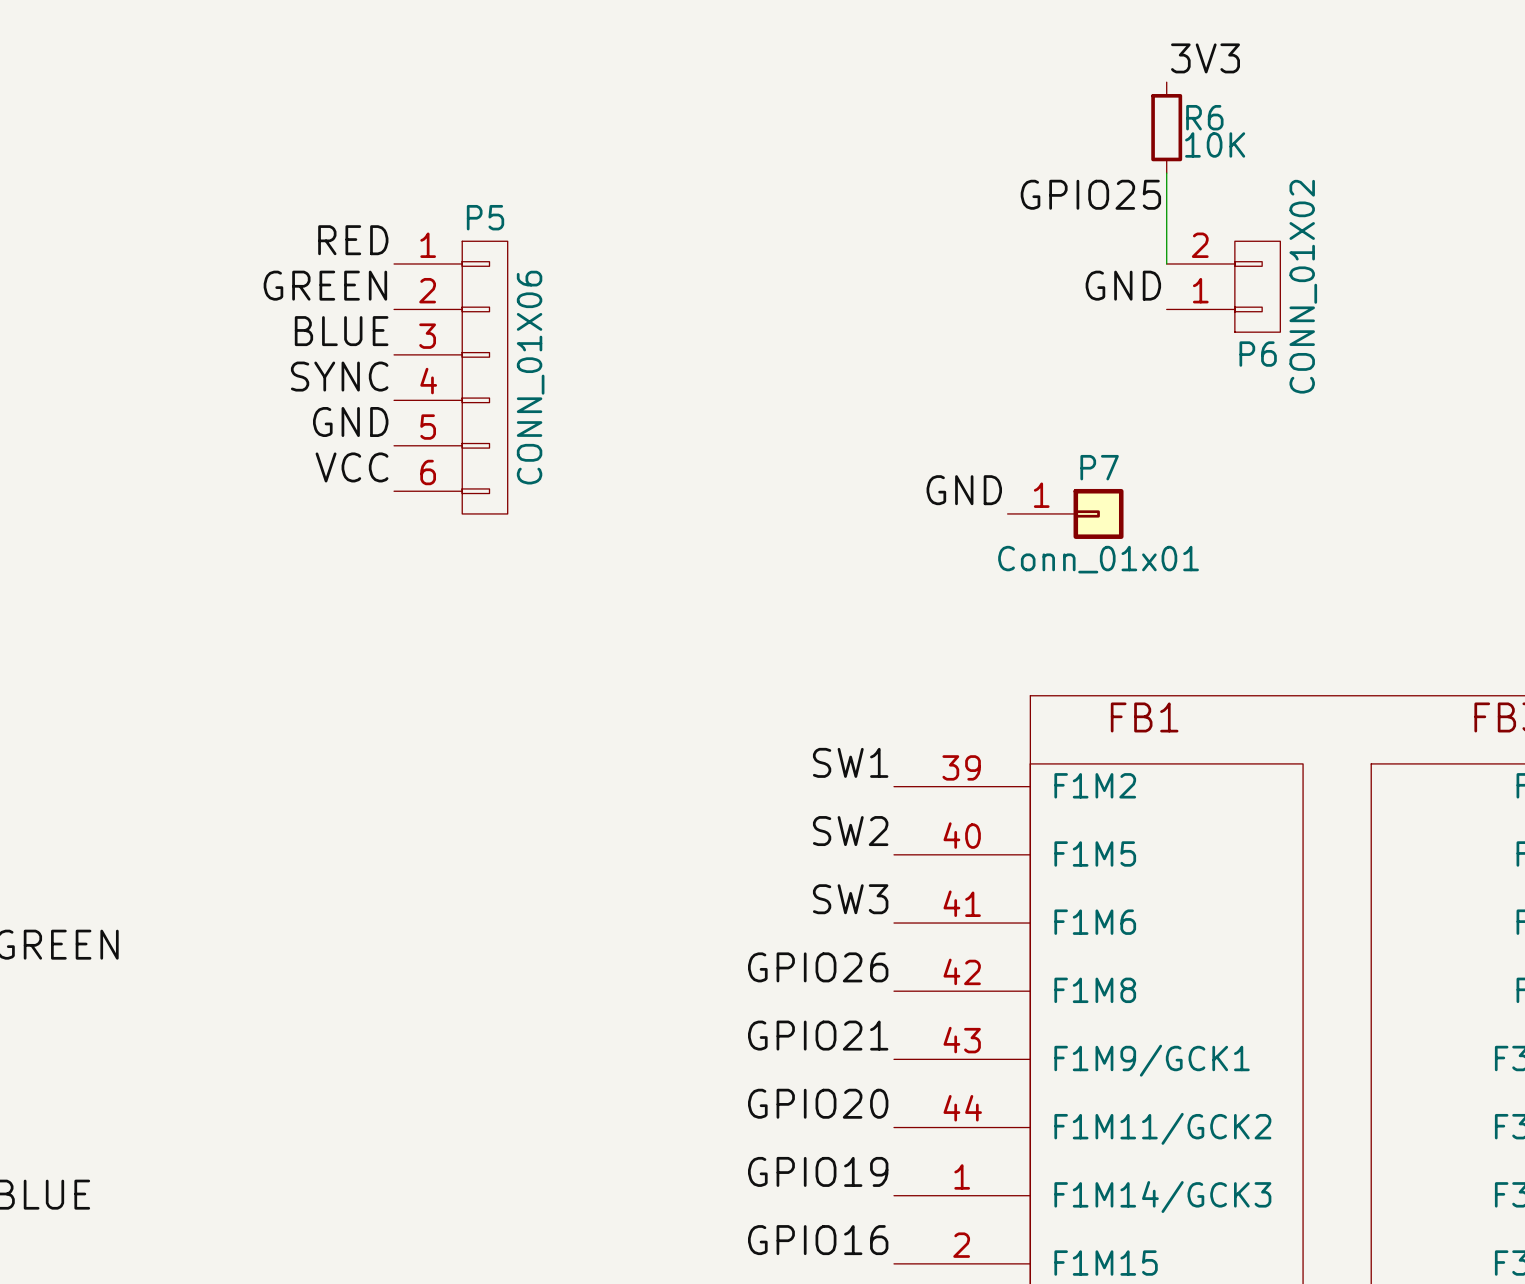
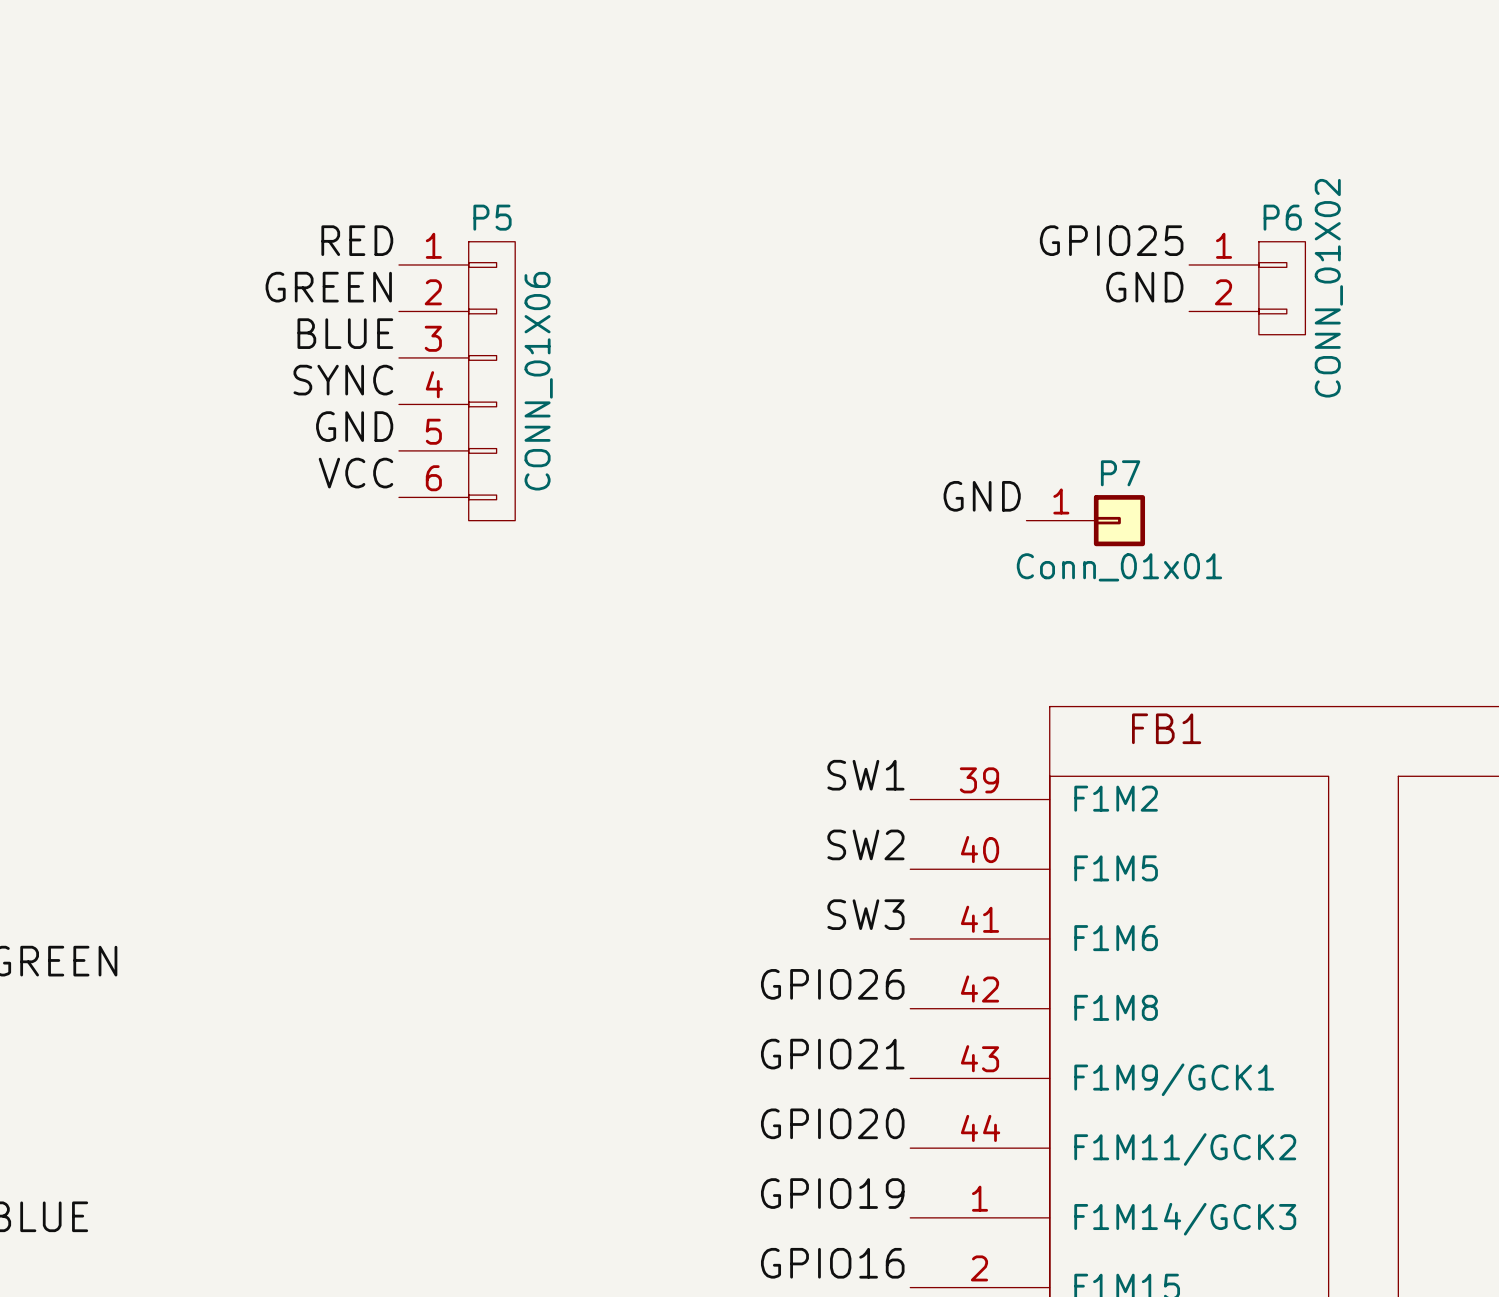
label: 3V3 (1205, 58) -> none
R6: 10K (1166, 127) -> none
wire: (1166, 173) (1166, 263) -> none
label position: GPIO25 (1090, 194) -> GPIO25 (1111, 240)
P6 flip: as is (1257, 286) -> up-down (1282, 288)

